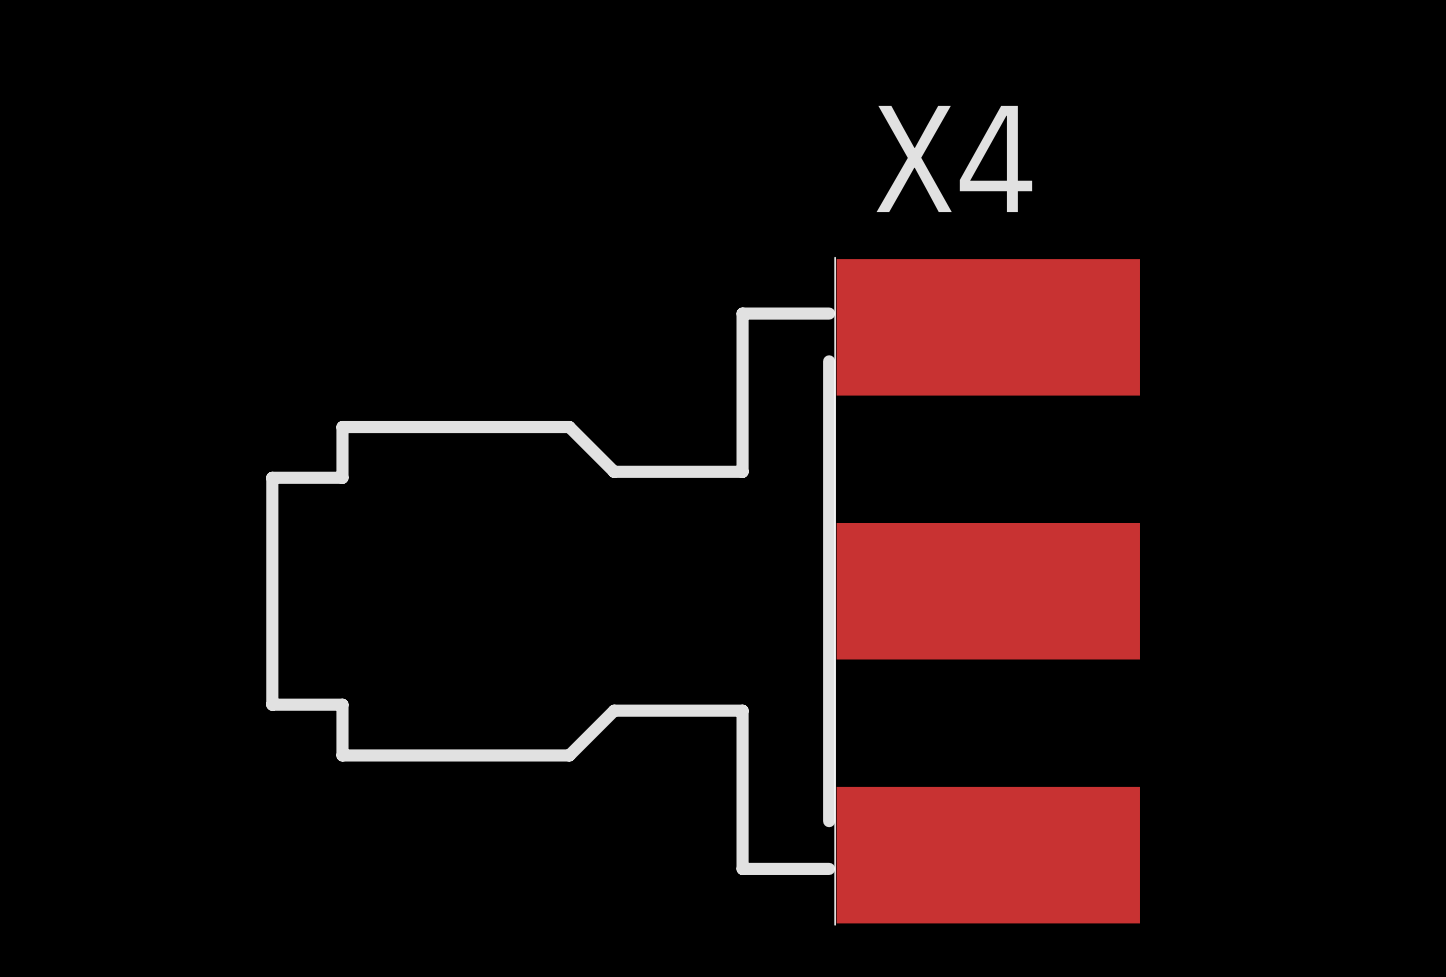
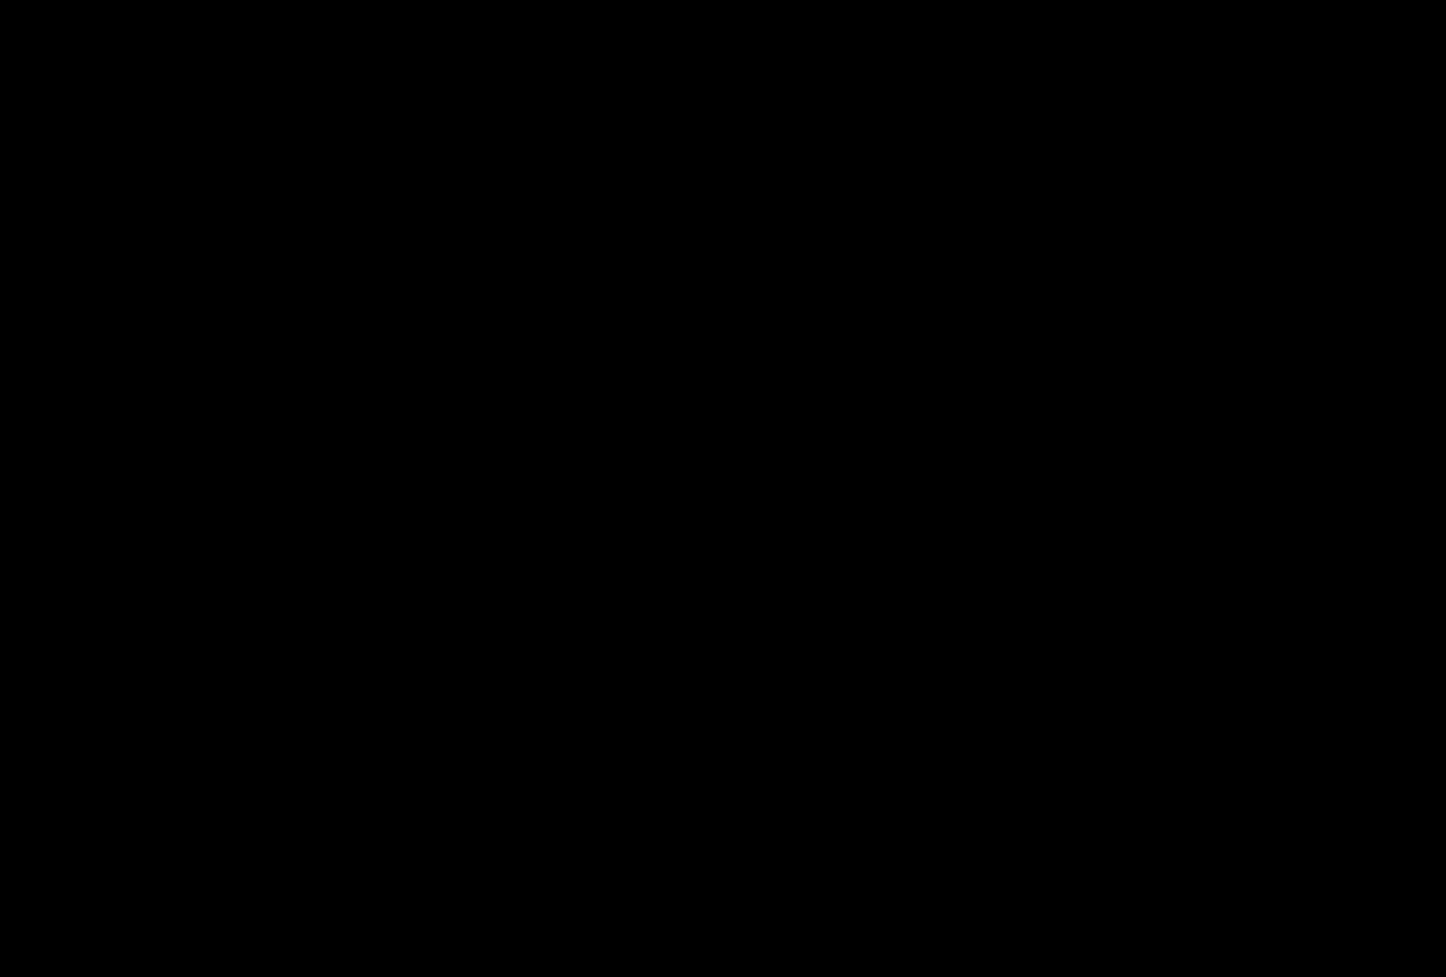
X4: (703, 591) -> none

